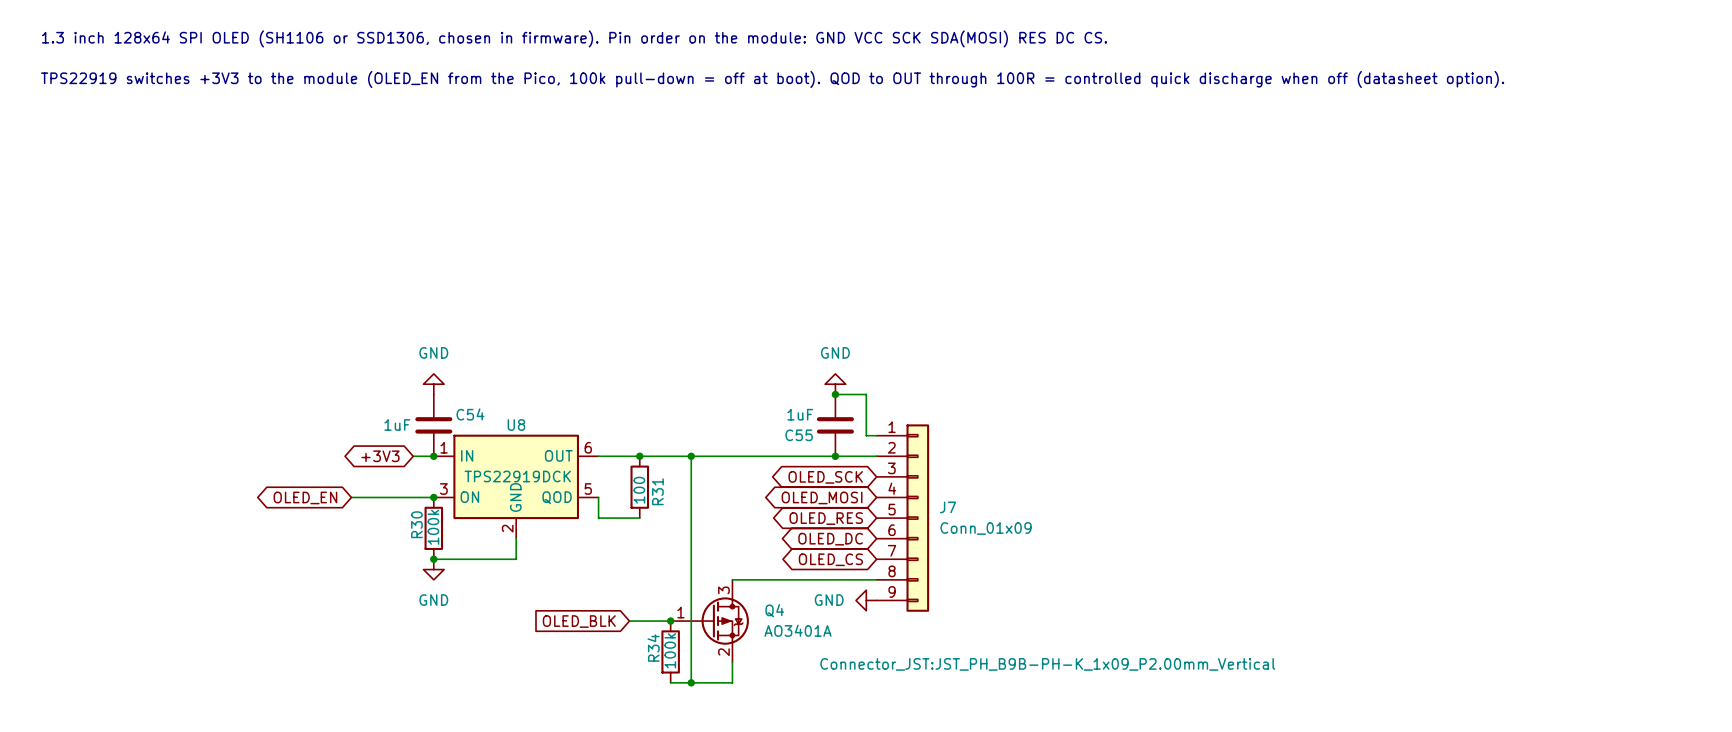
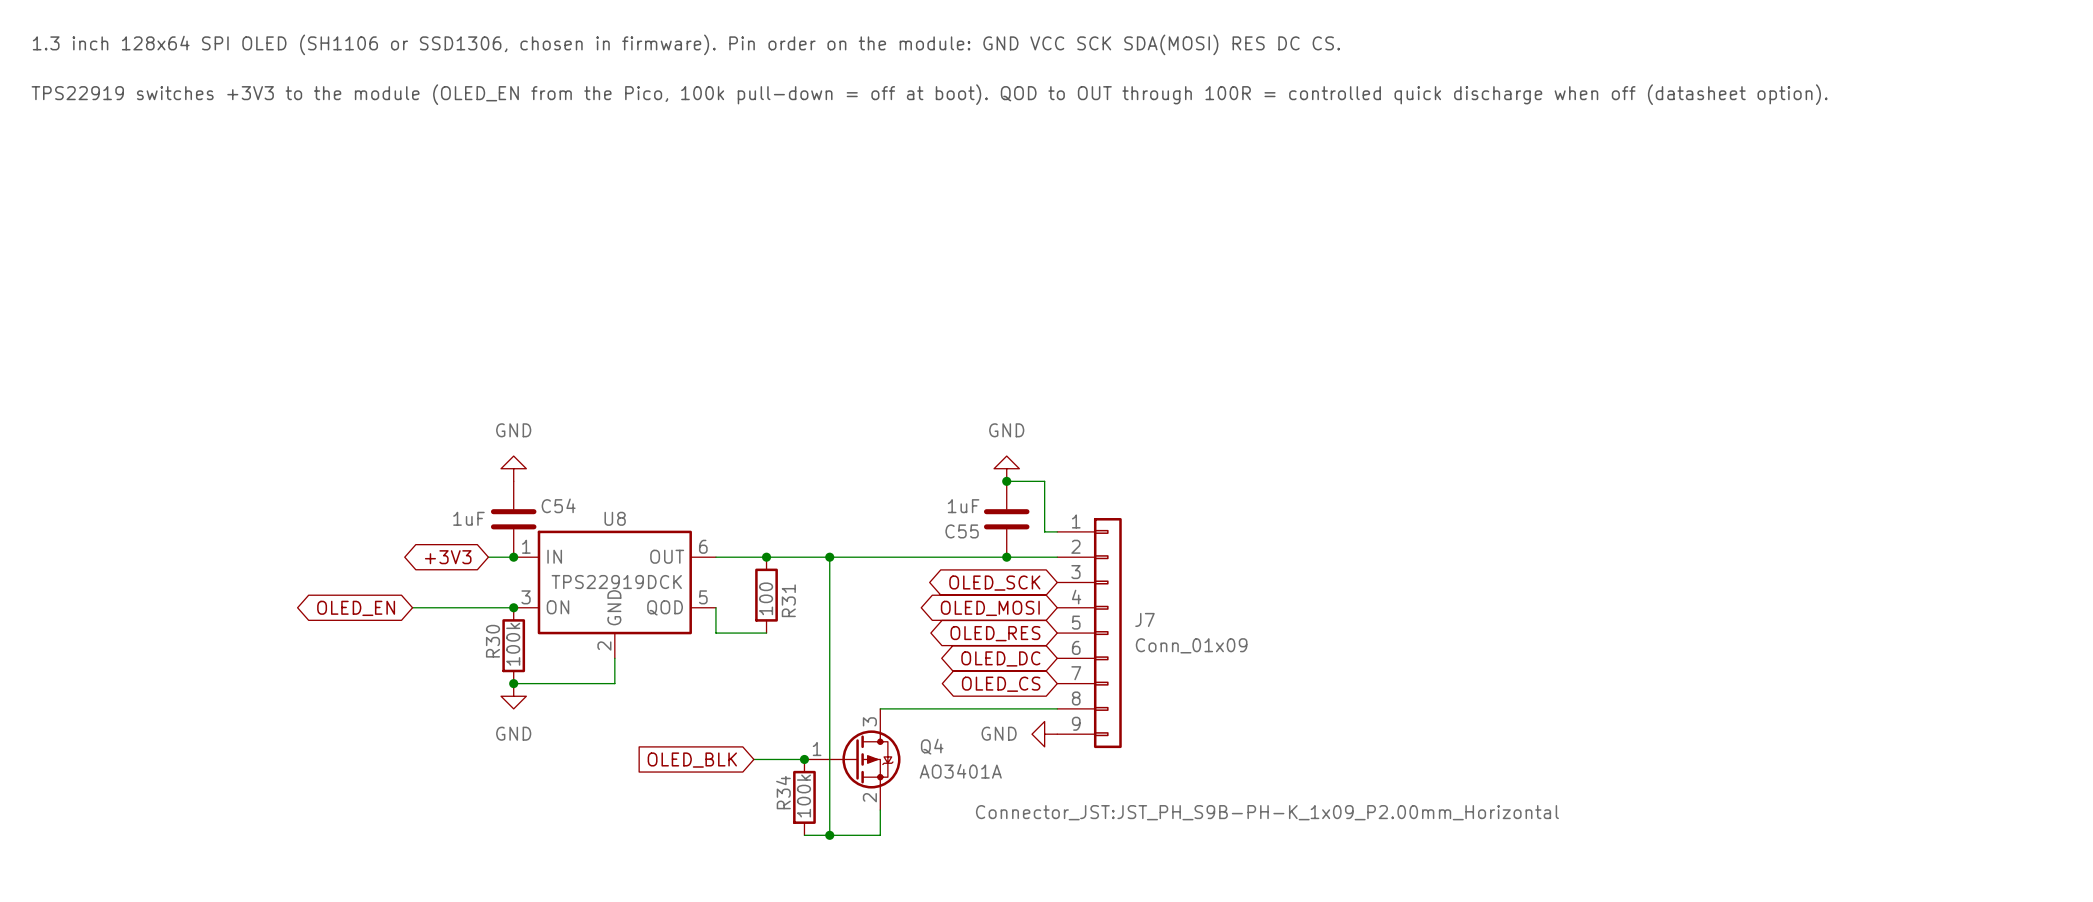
J7 text: Connector_JST:JST_PH_B9B-PH-K_1x09_P2.00mm_Vertical (1047, 664) -> Connector_JST:JST_PH_S9B-PH-K_1x09_P2.00mm_Horizontal (1267, 812)

